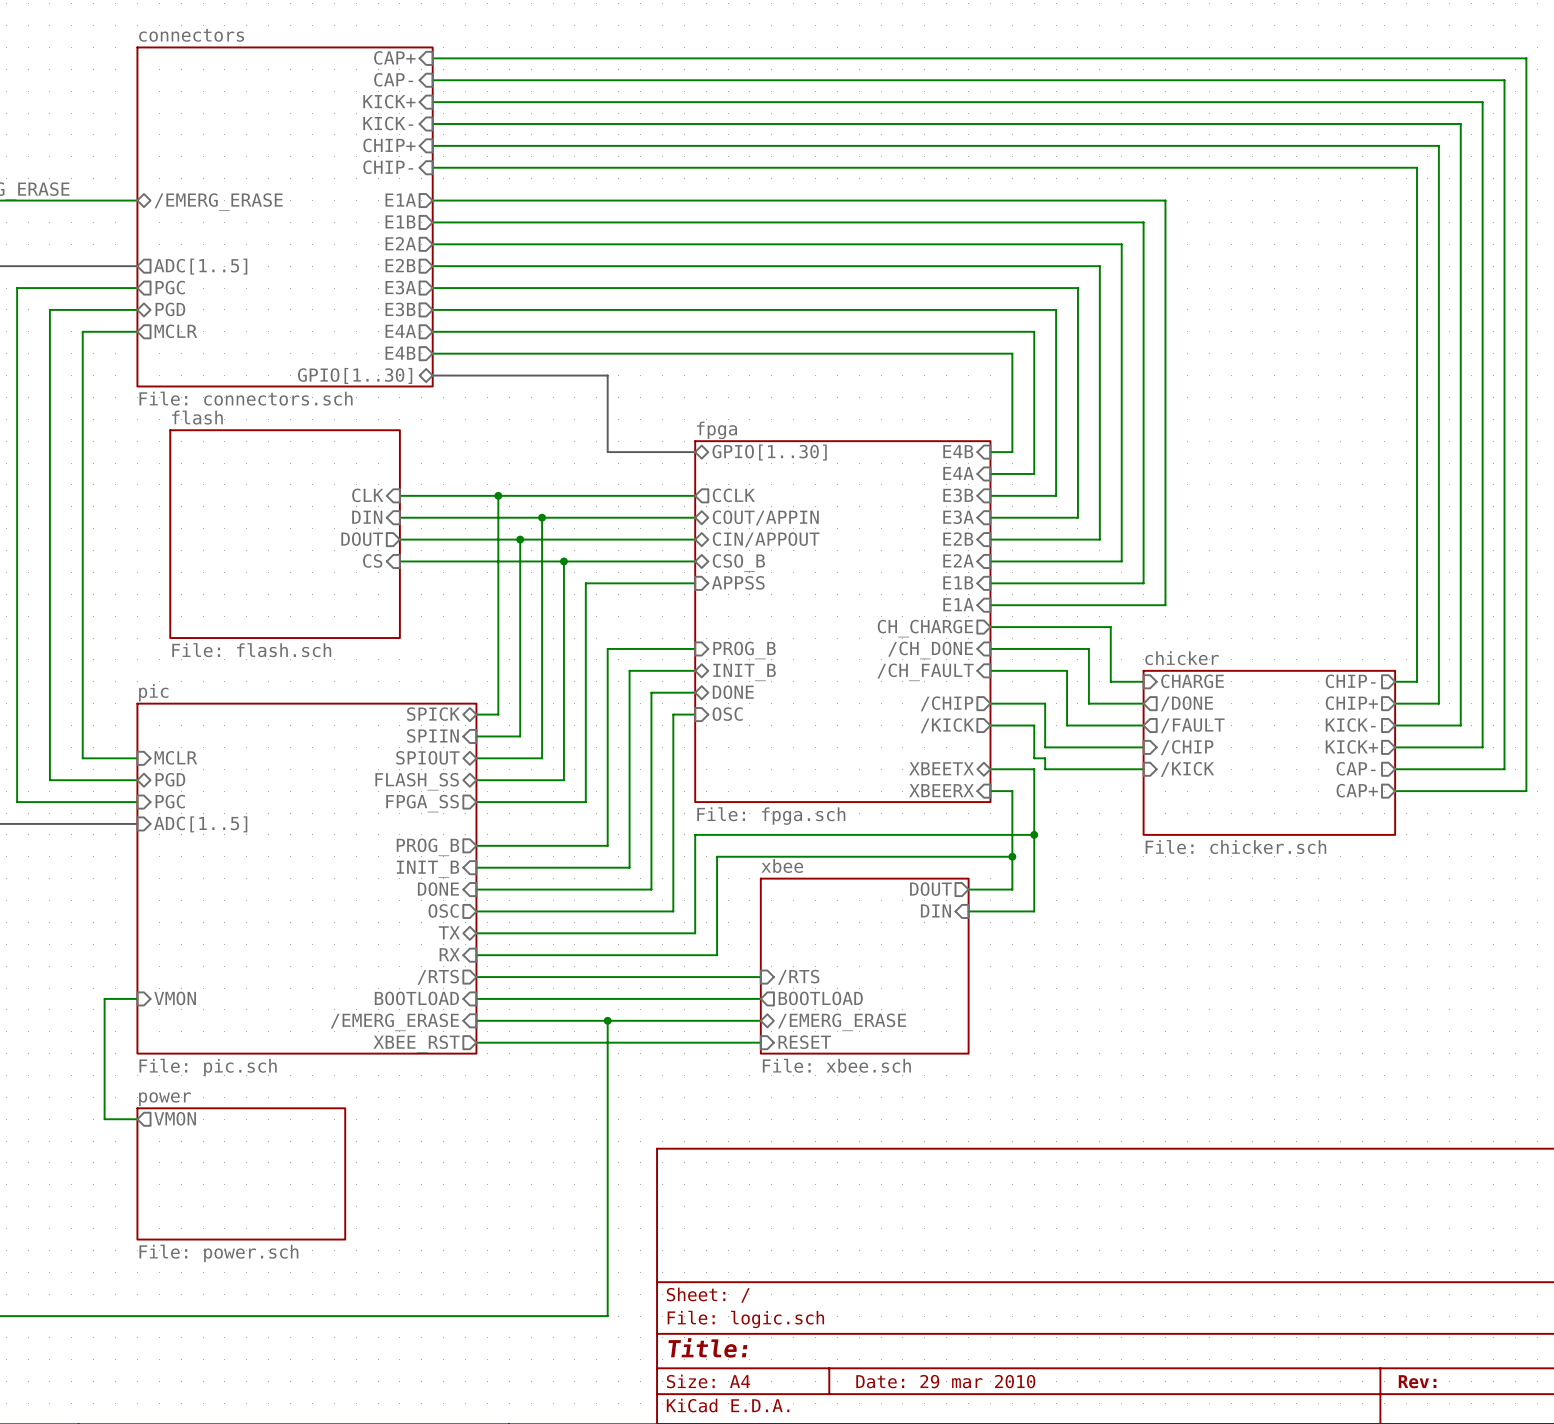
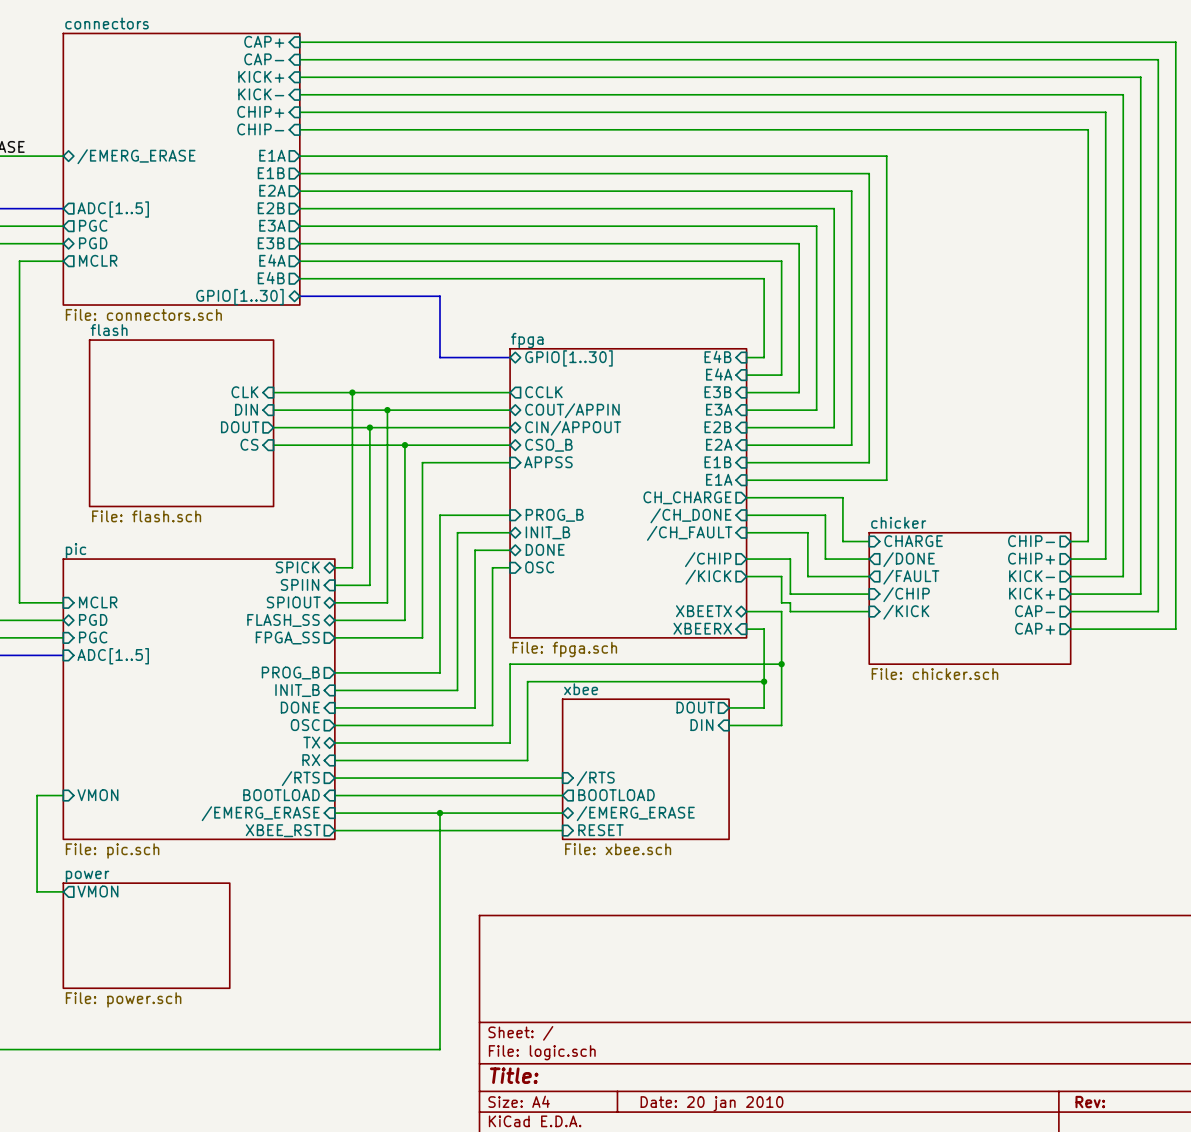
title block: Date: 29 mar 2010 (945, 1381) -> Date: 20 jan 2010 (712, 1103)

